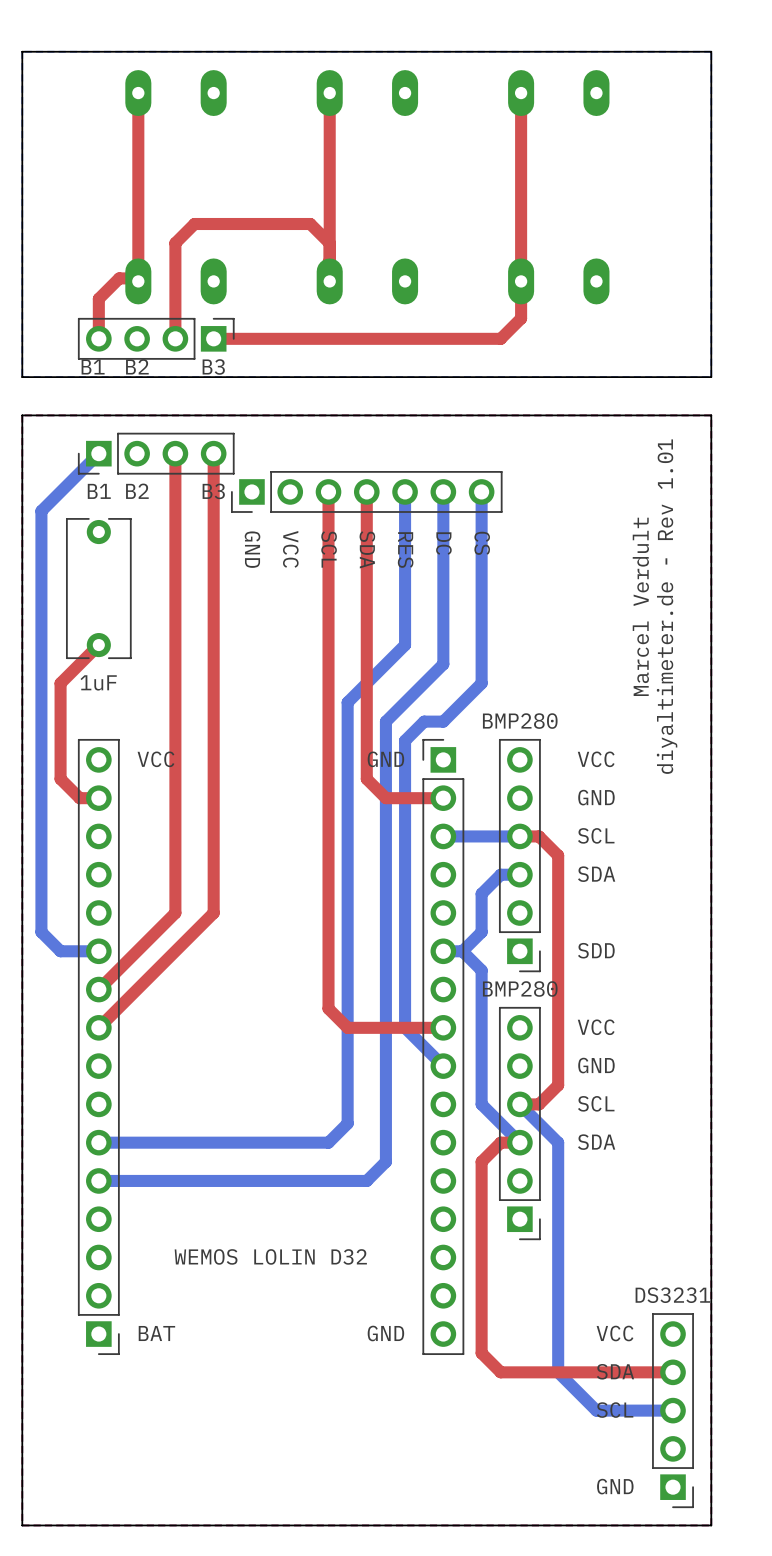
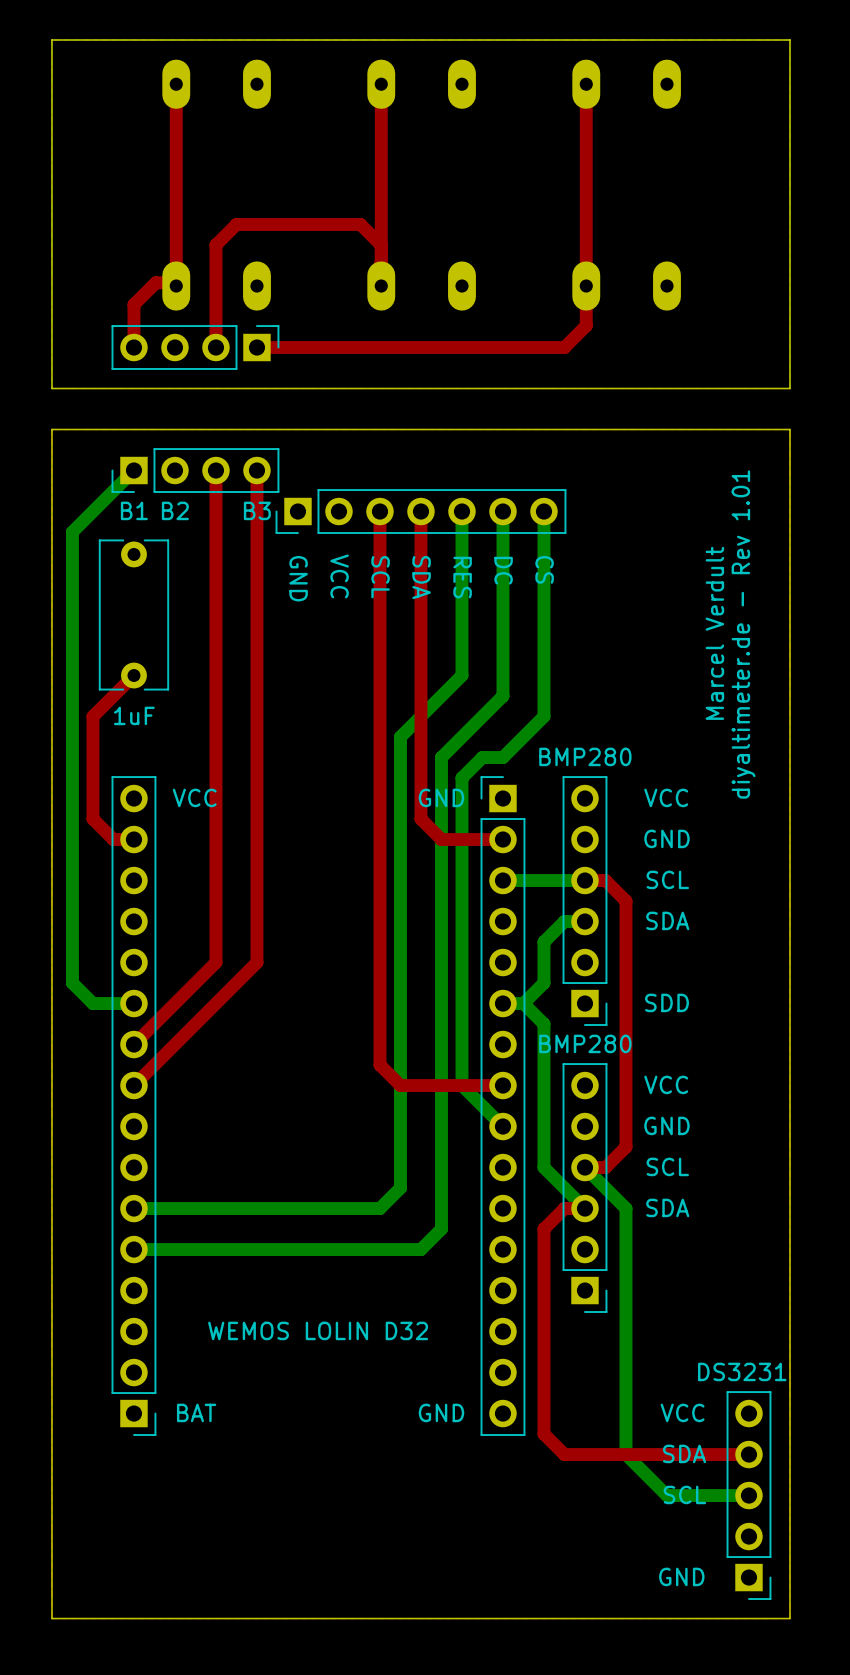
text: B1 (93, 366) -> none
text: B2 (137, 366) -> none
text: B3 (213, 366) -> none

